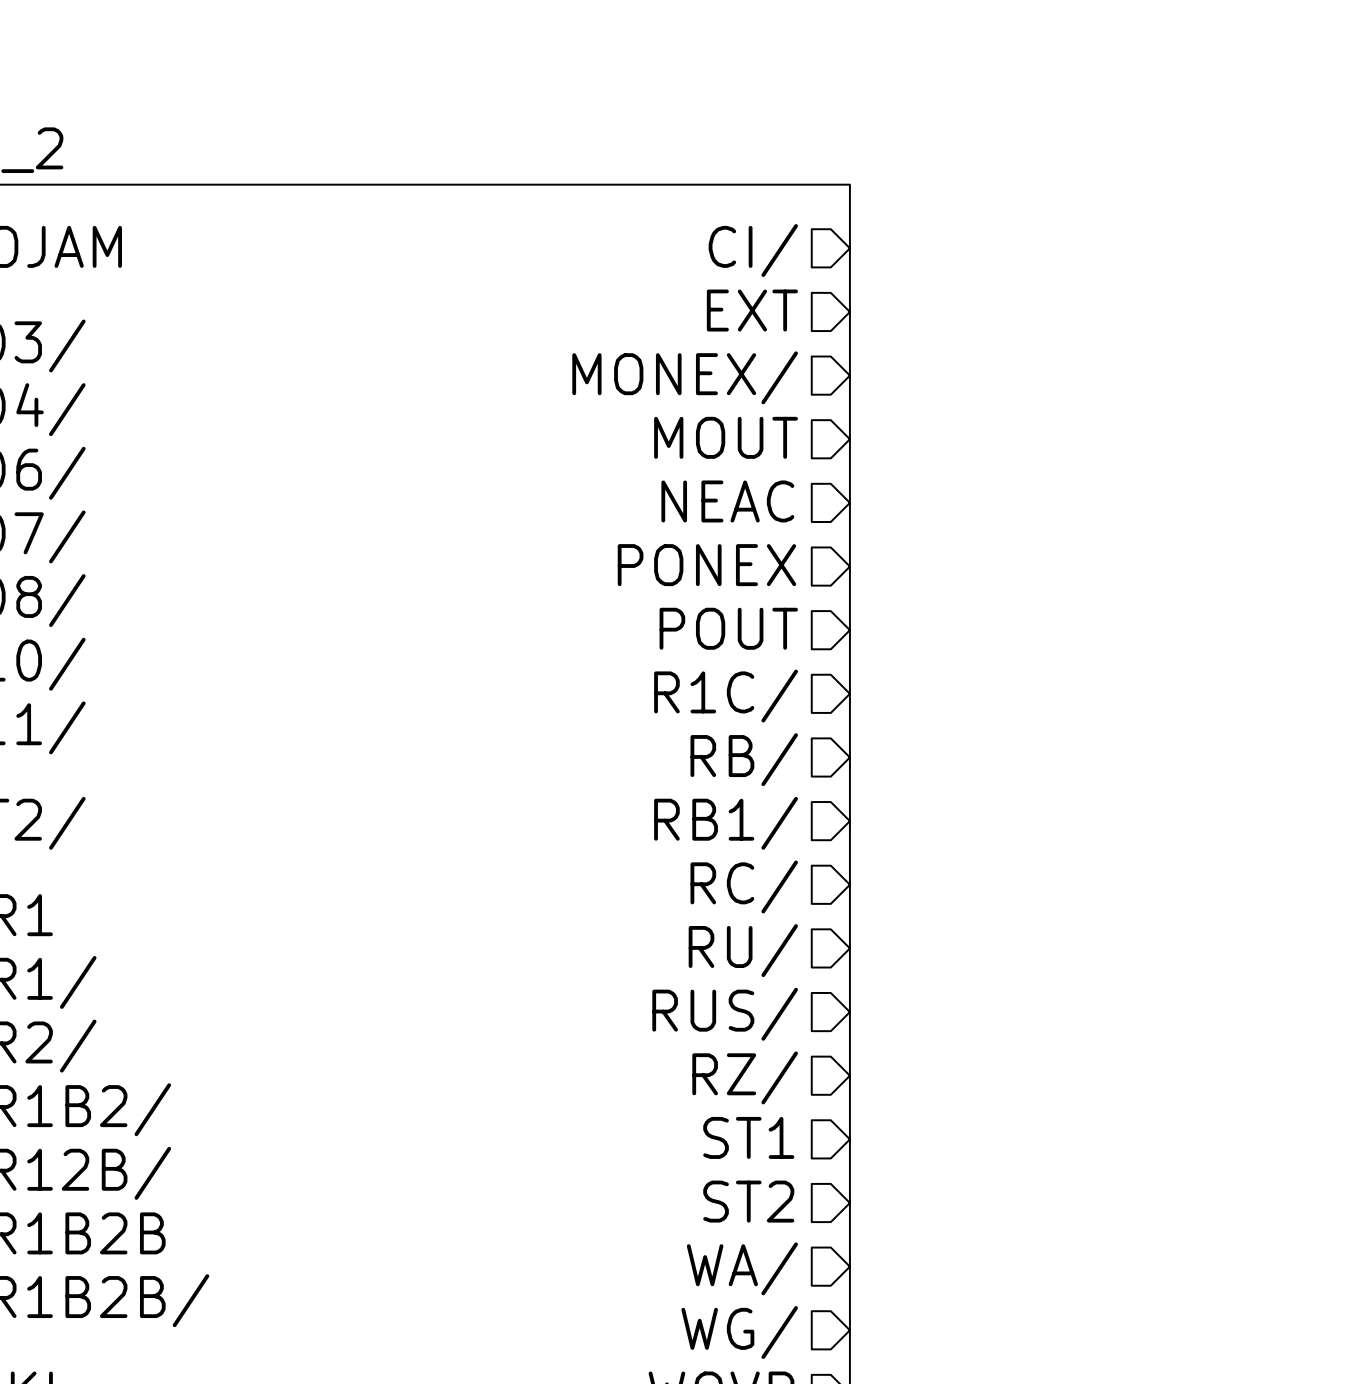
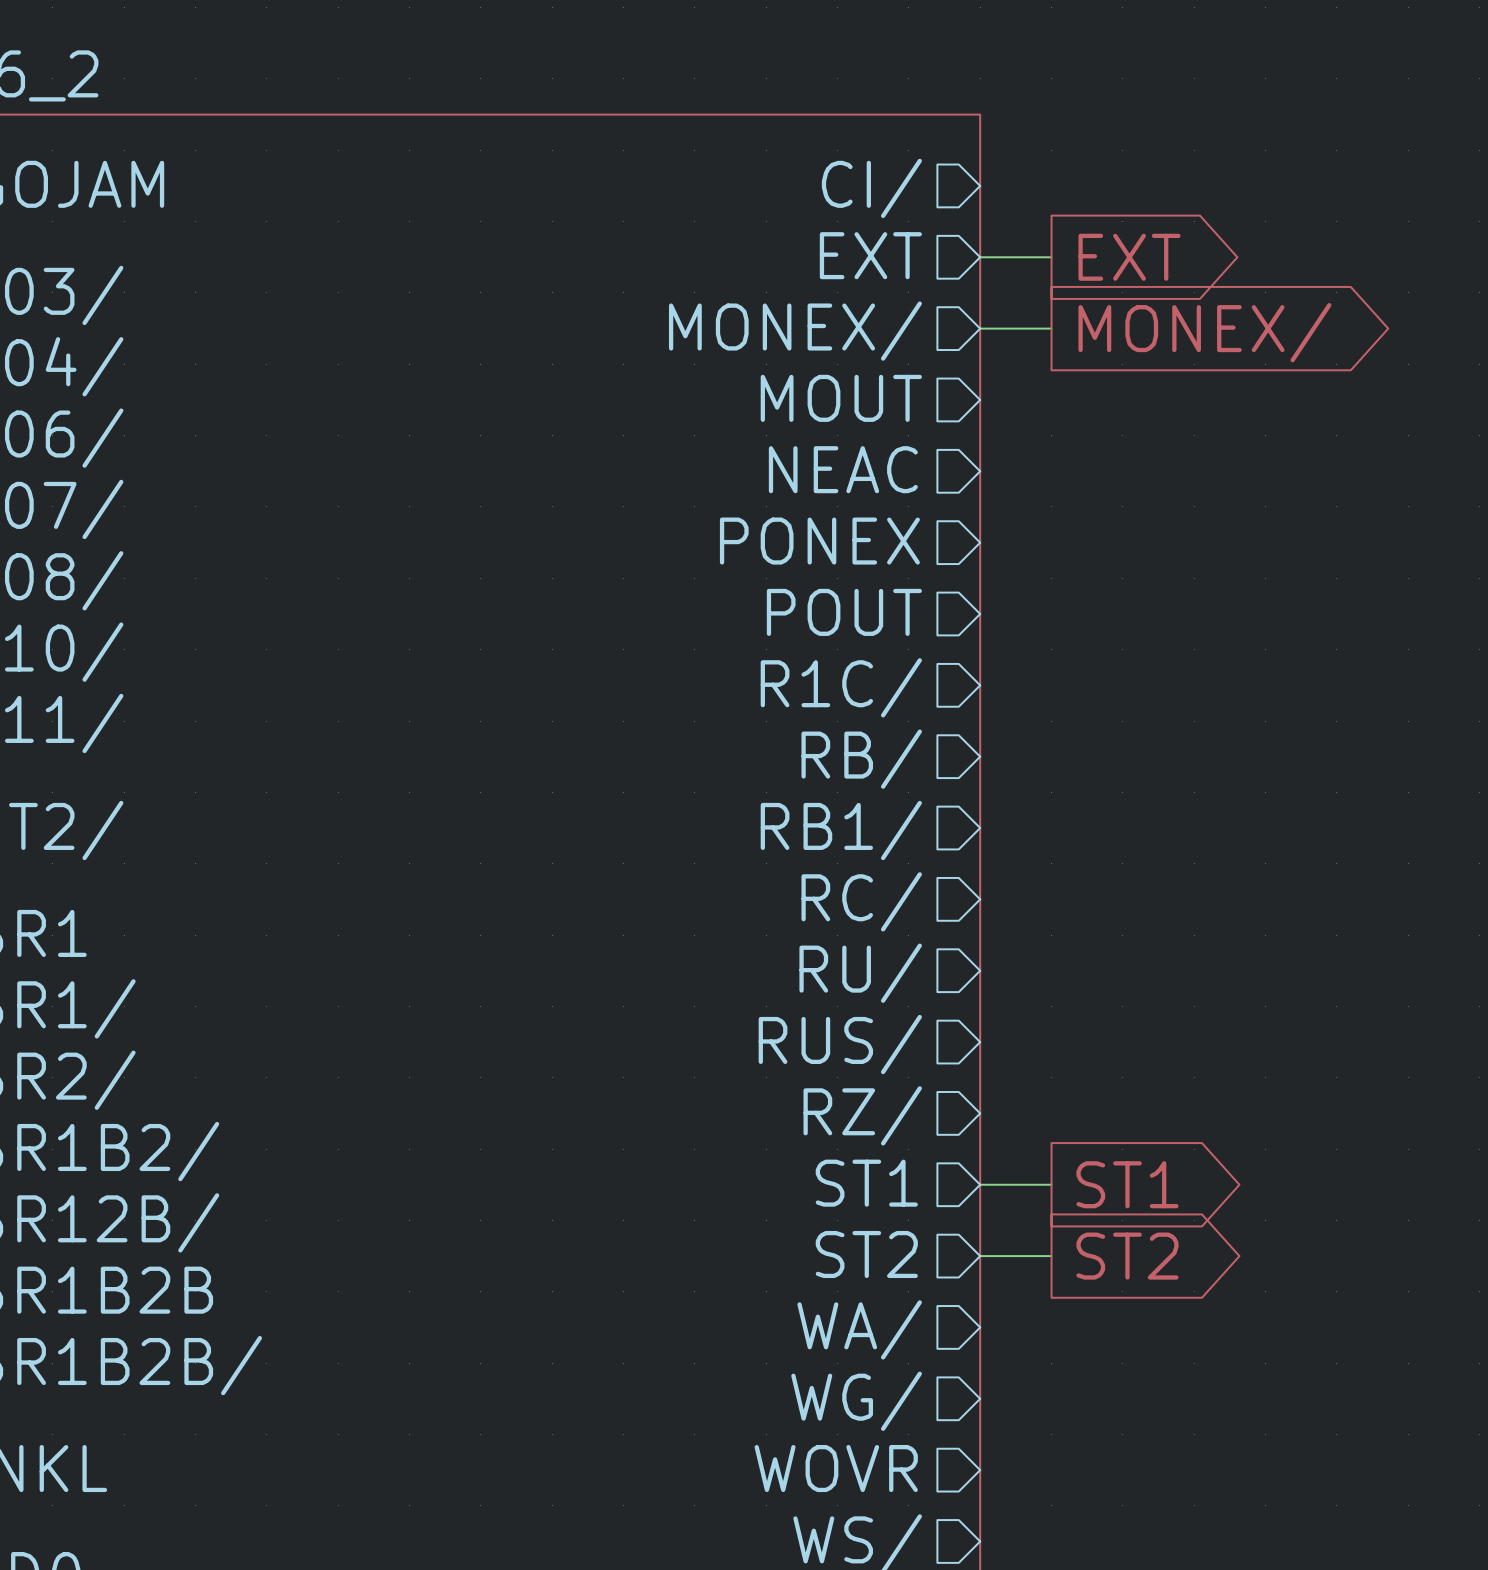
wire: none -> (980, 257) (1051, 257)
global label: none -> EXT (1129, 257)
wire: none -> (980, 328) (1051, 328)
global label: none -> MONEX/ (1204, 332)
wire: none -> (980, 1184) (1051, 1184)
global label: none -> ST1 (1127, 1184)
wire: none -> (980, 1256) (1051, 1256)
global label: none -> ST2 (1127, 1256)

